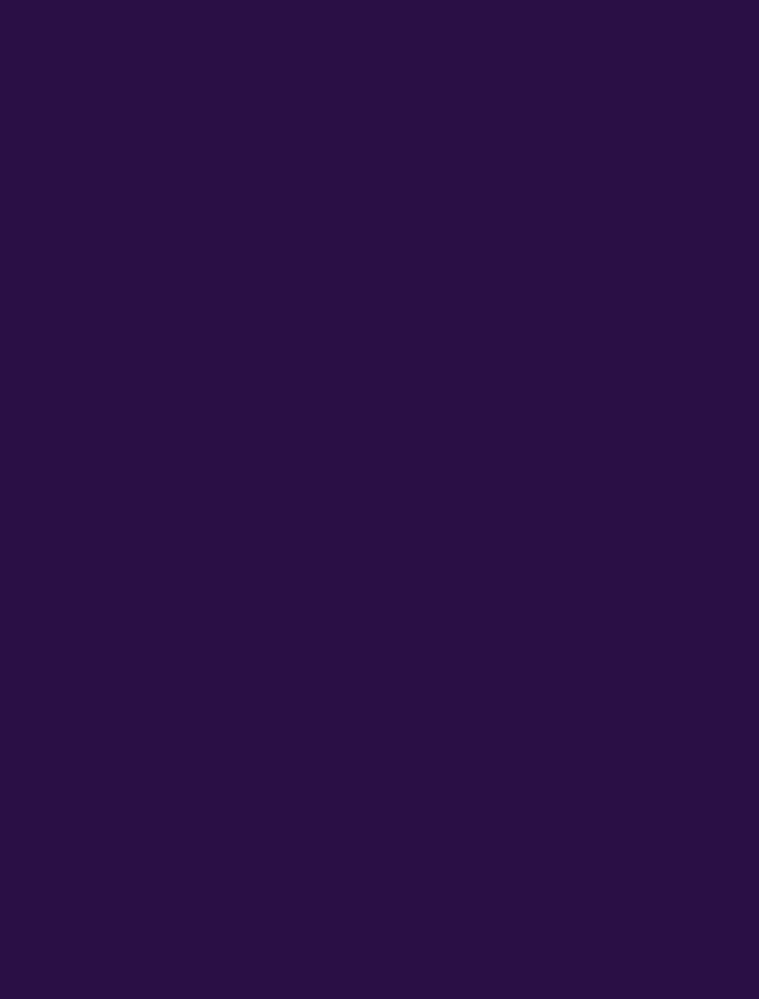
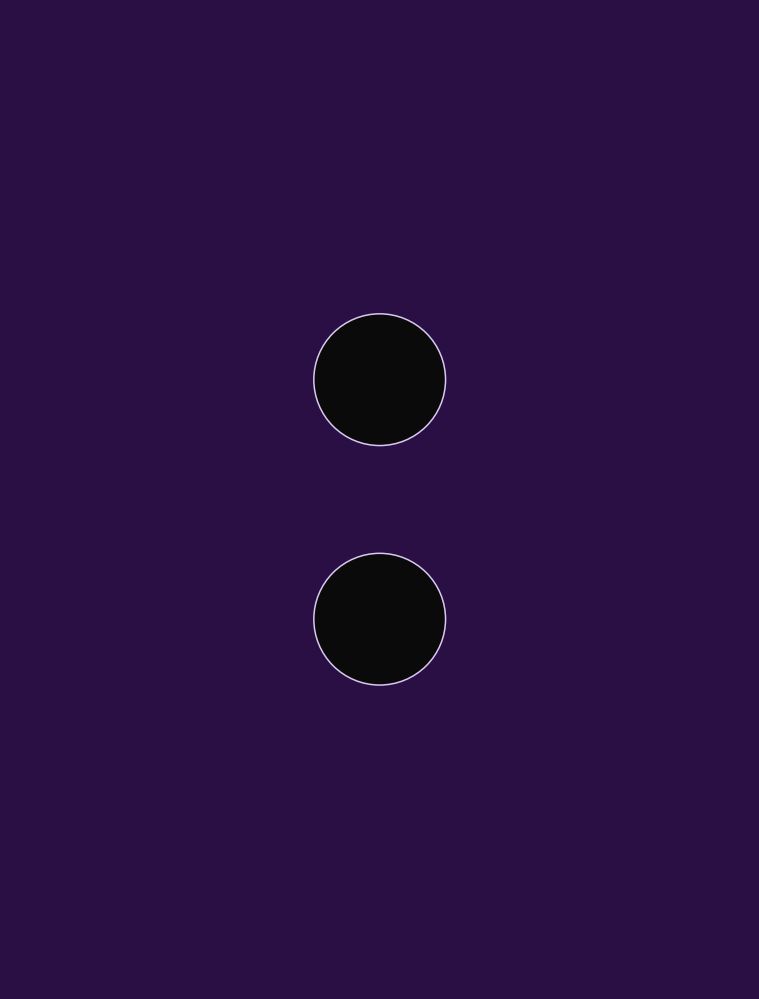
part: none -> (379, 379)
part: none -> (379, 619)

